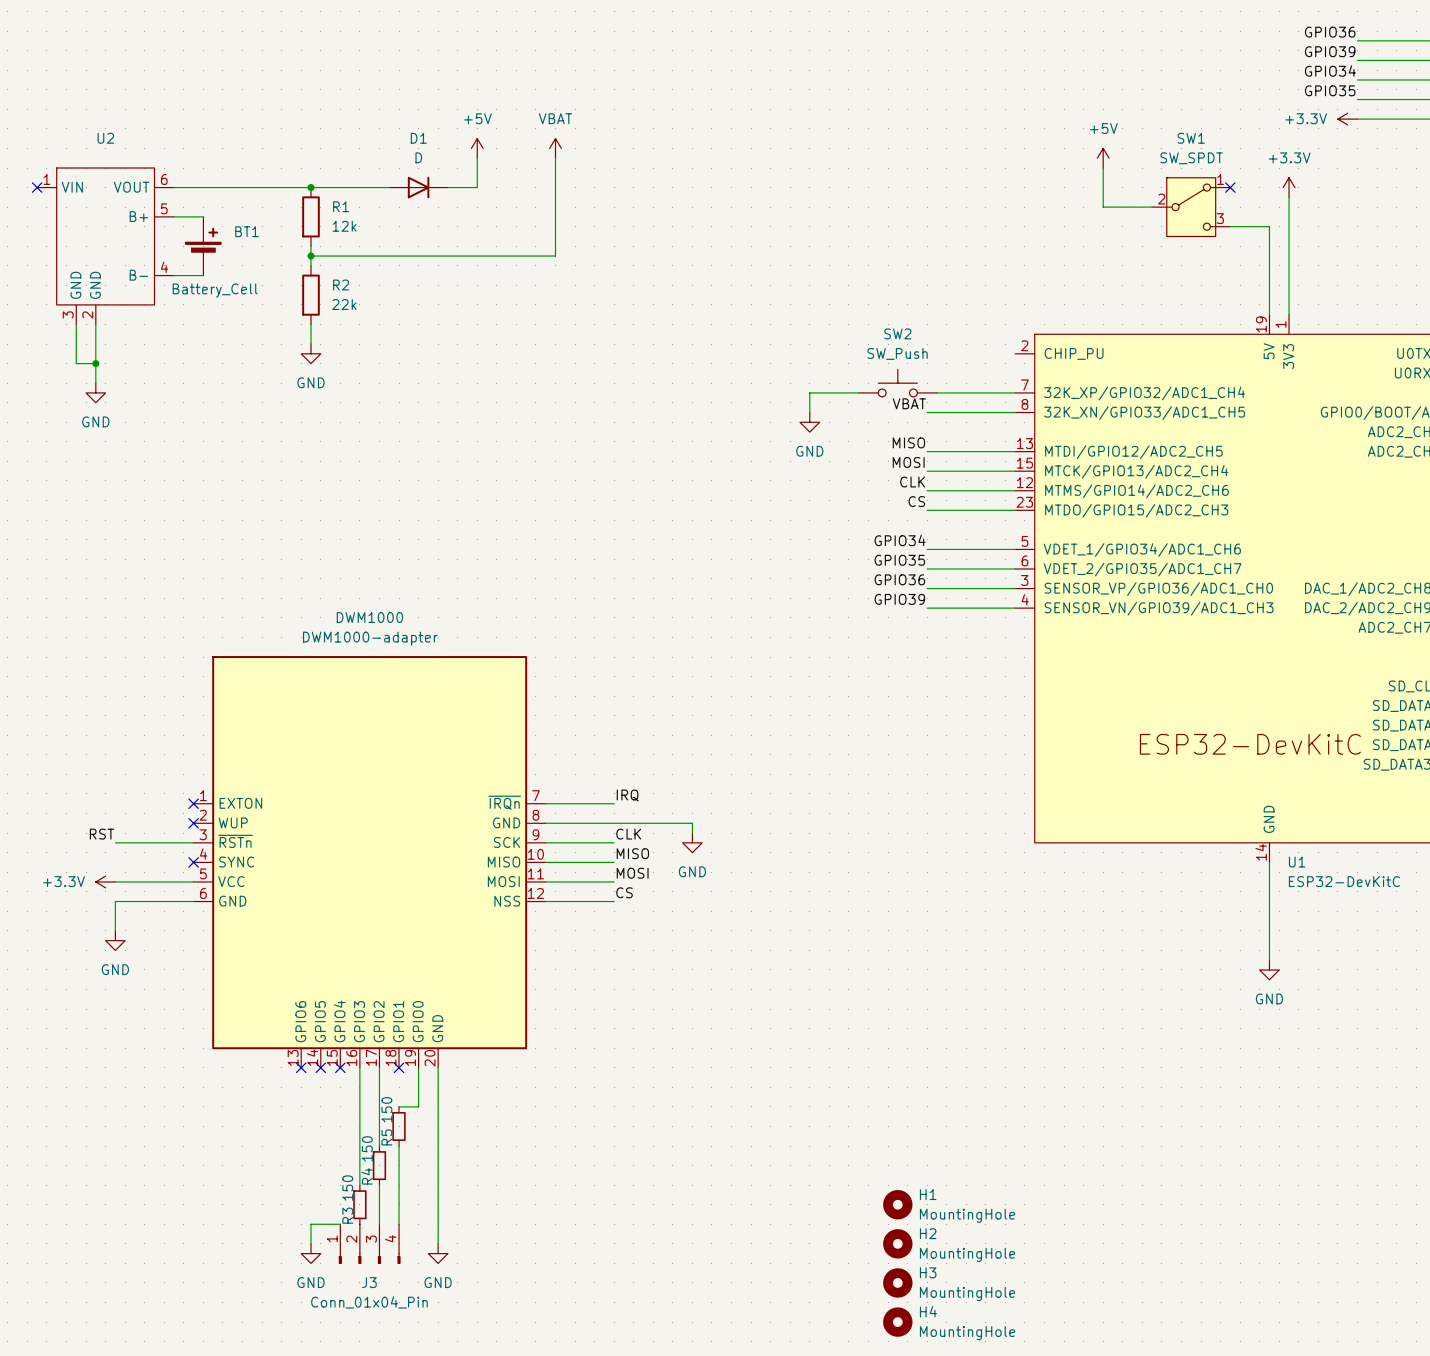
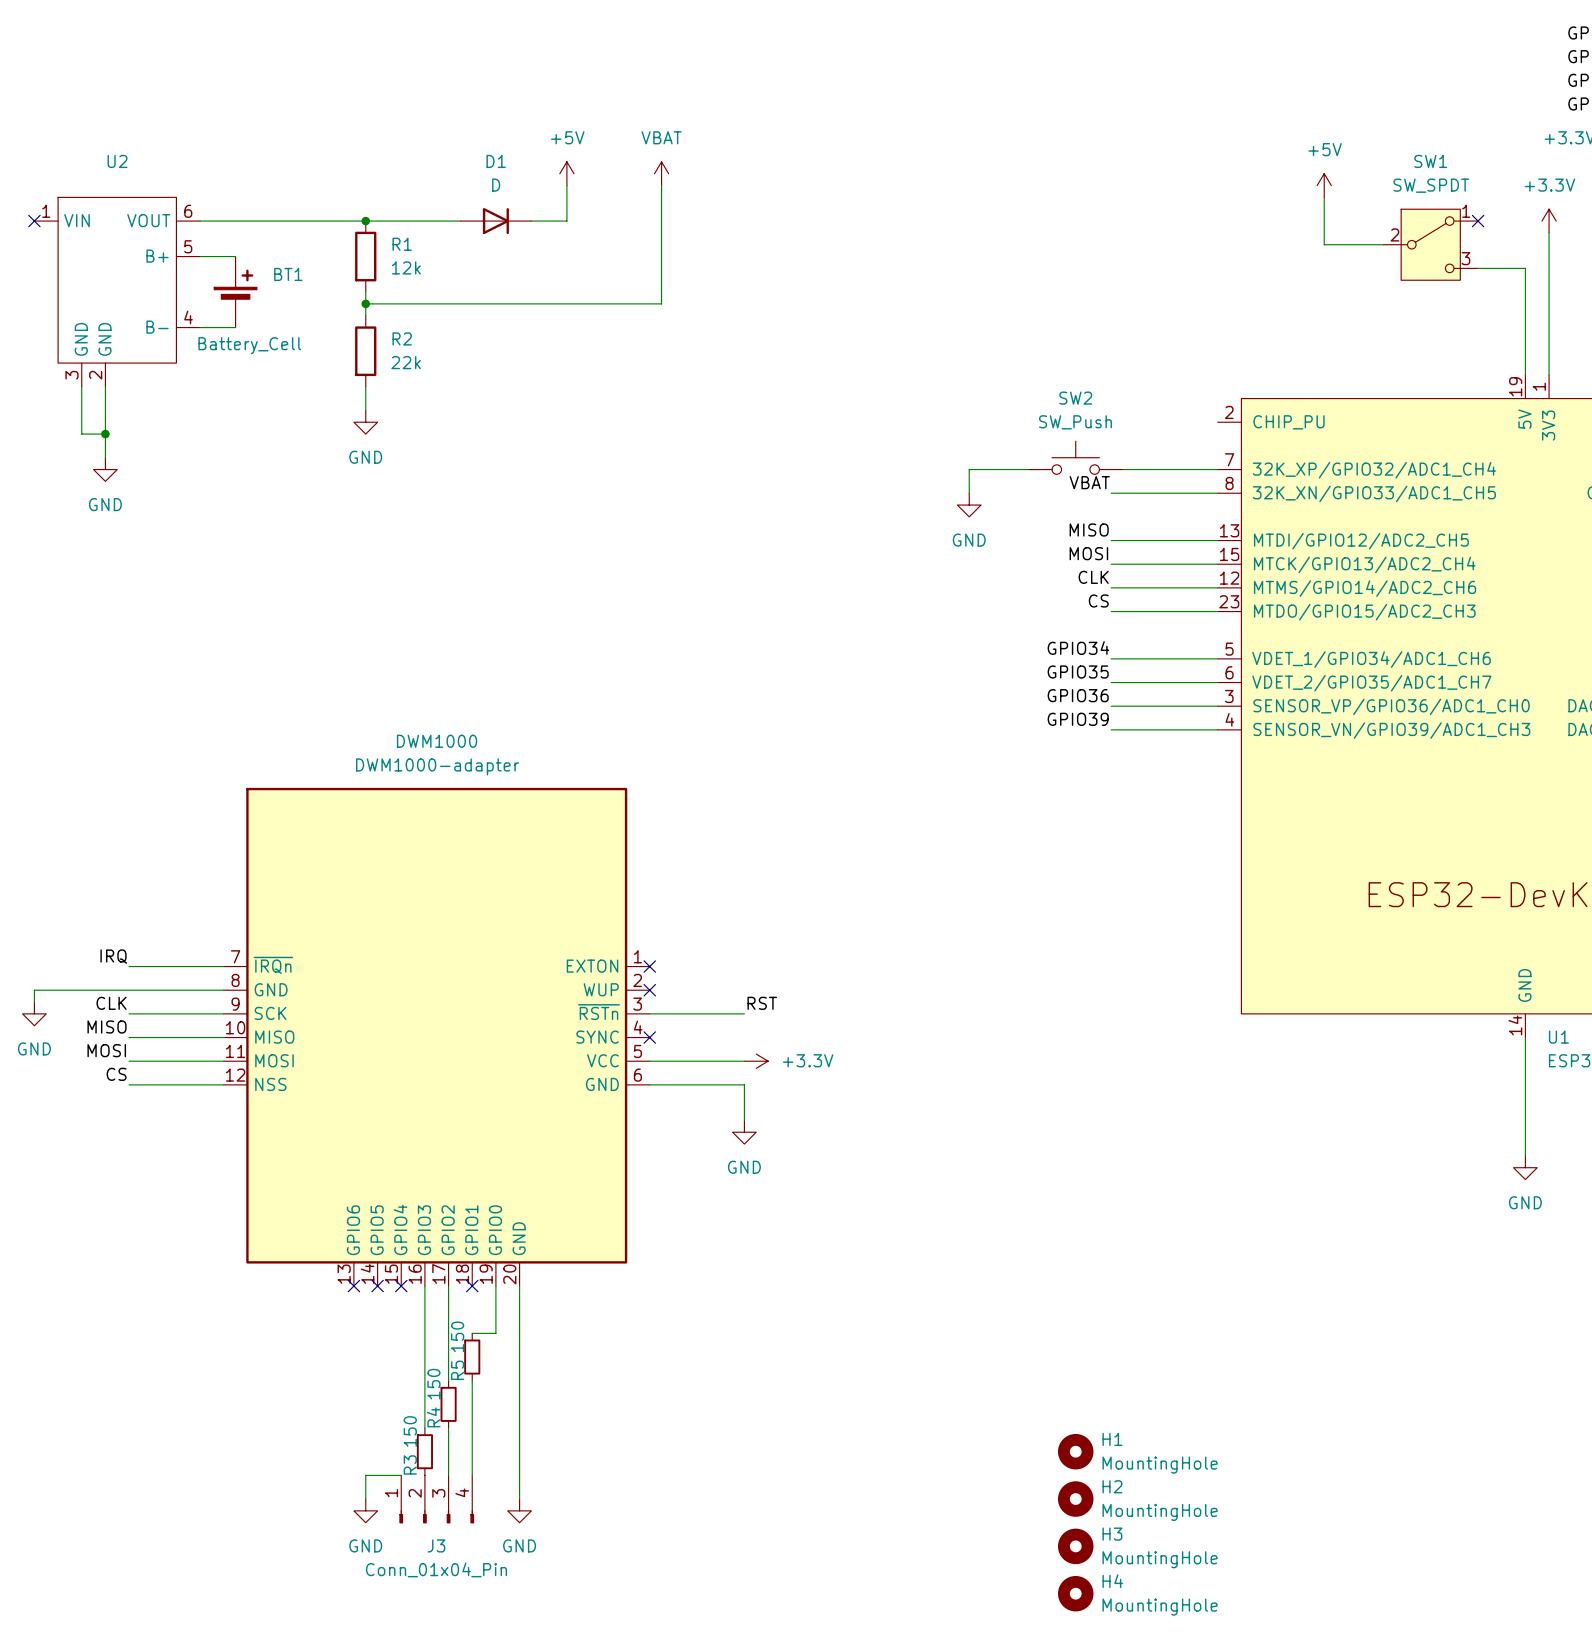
DWM1000 symbol: [193, 656, 546, 1068] -> [223, 787, 650, 1287]
label: none -> IRQ (113, 956)
label: IRQ (627, 795) -> none
wire: none -> (129, 966) (223, 966)
no-connect mark: (193, 803) -> none
wire: (545, 803) (614, 803) -> none
no-connect mark: none -> (649, 966)
wire: none -> (223, 990) (34, 990) (34, 1002)
no-connect mark: (193, 823) -> none
wire: (545, 823) (692, 823) (692, 833) -> none
no-connect mark: none -> (649, 990)
label: RST (102, 834) -> CLK (111, 1003)
label: CLK (628, 834) -> none
label: none -> RST (762, 1003)
wire: none -> (732, 1013) (744, 1013)
power symbol position: GND (692, 842) -> GND (744, 1132)
label: none -> MISO (107, 1026)
label: MISO (632, 853) -> none
wire: none -> (129, 1037) (223, 1037)
no-connect mark: (193, 862) -> none
wire: (545, 862) (614, 862) -> none
no-connect mark: none -> (649, 1037)
label: none -> MOSI (106, 1050)
label: MOSI (632, 873) -> none
power symbol: +3.3V (105, 881) -> none
wire: none -> (732, 1061) (744, 1061)
power symbol: none -> +3.3V (756, 1061)
label: none -> CS (116, 1074)
label: CS (624, 892) -> none
wire: (115, 901) (115, 930) -> none
wire: none -> (732, 1084) (744, 1084) (744, 1120)
power symbol position: GND (115, 940) -> GND (34, 1013)

